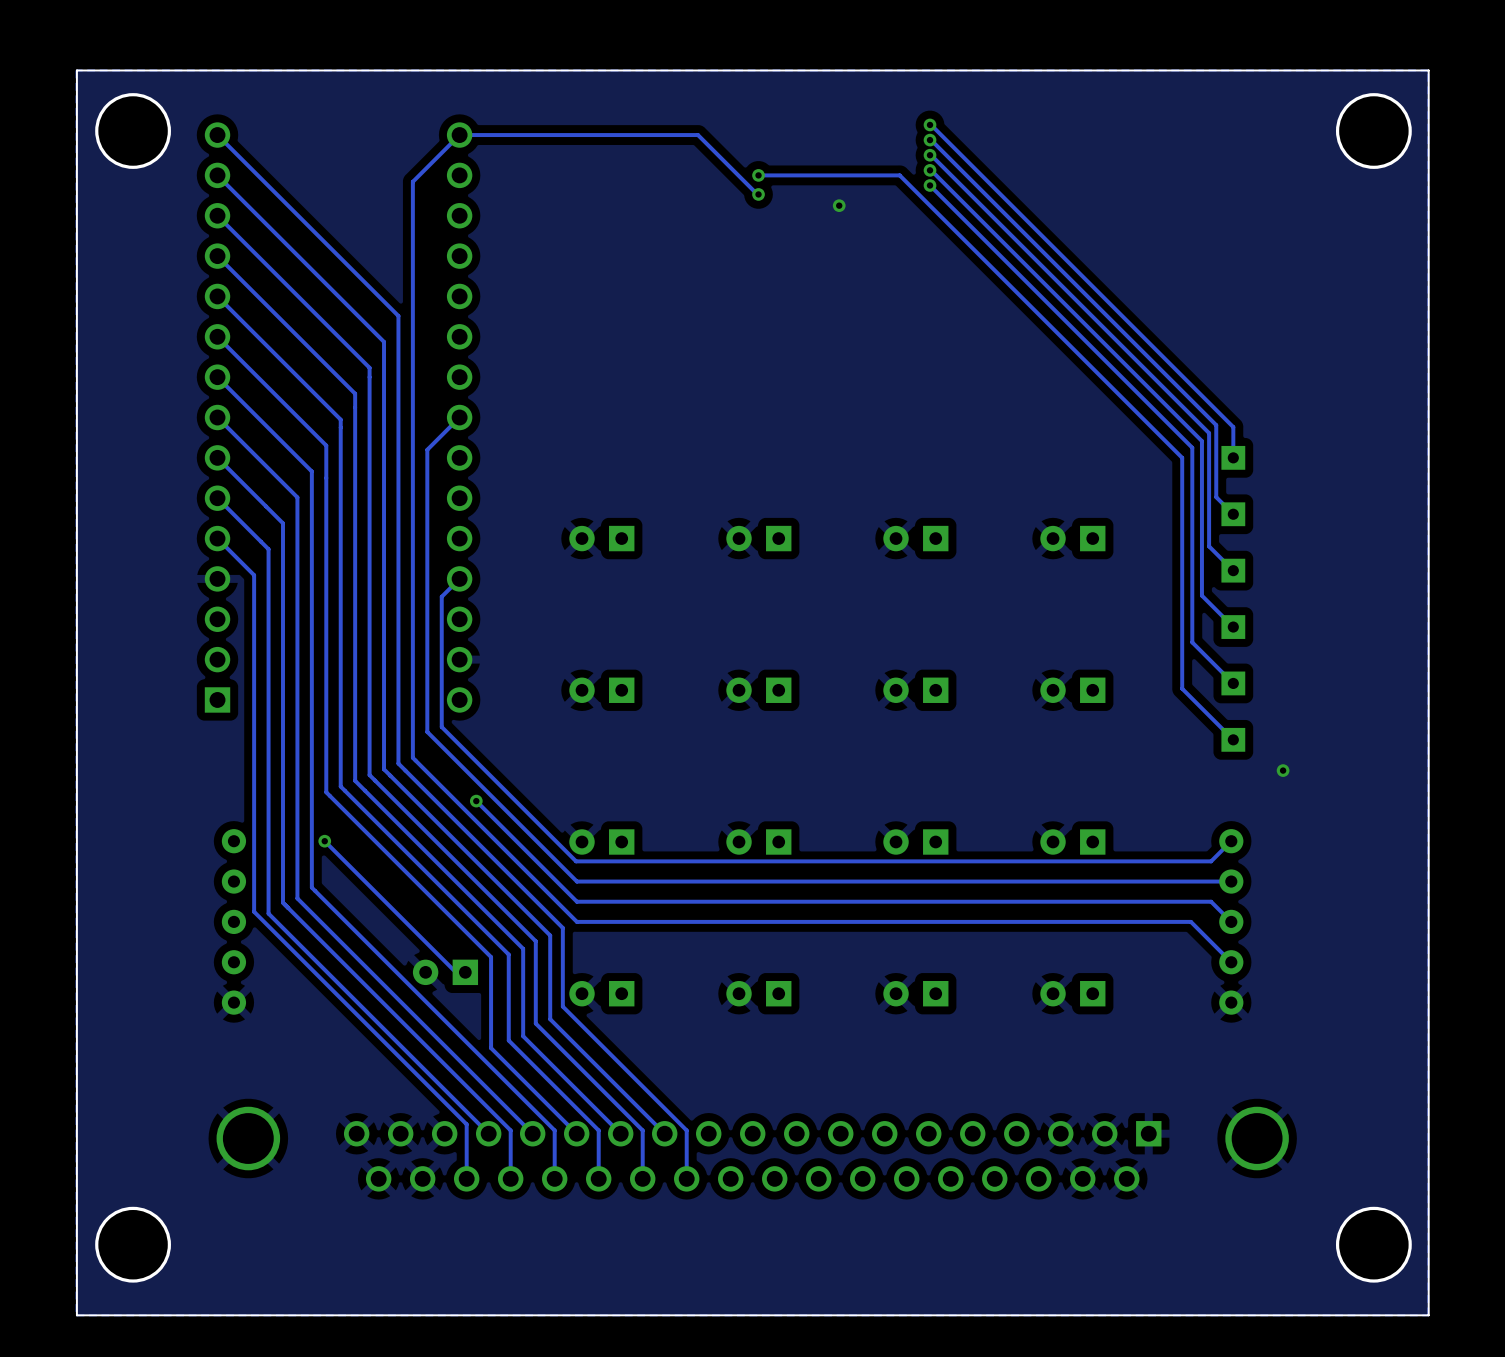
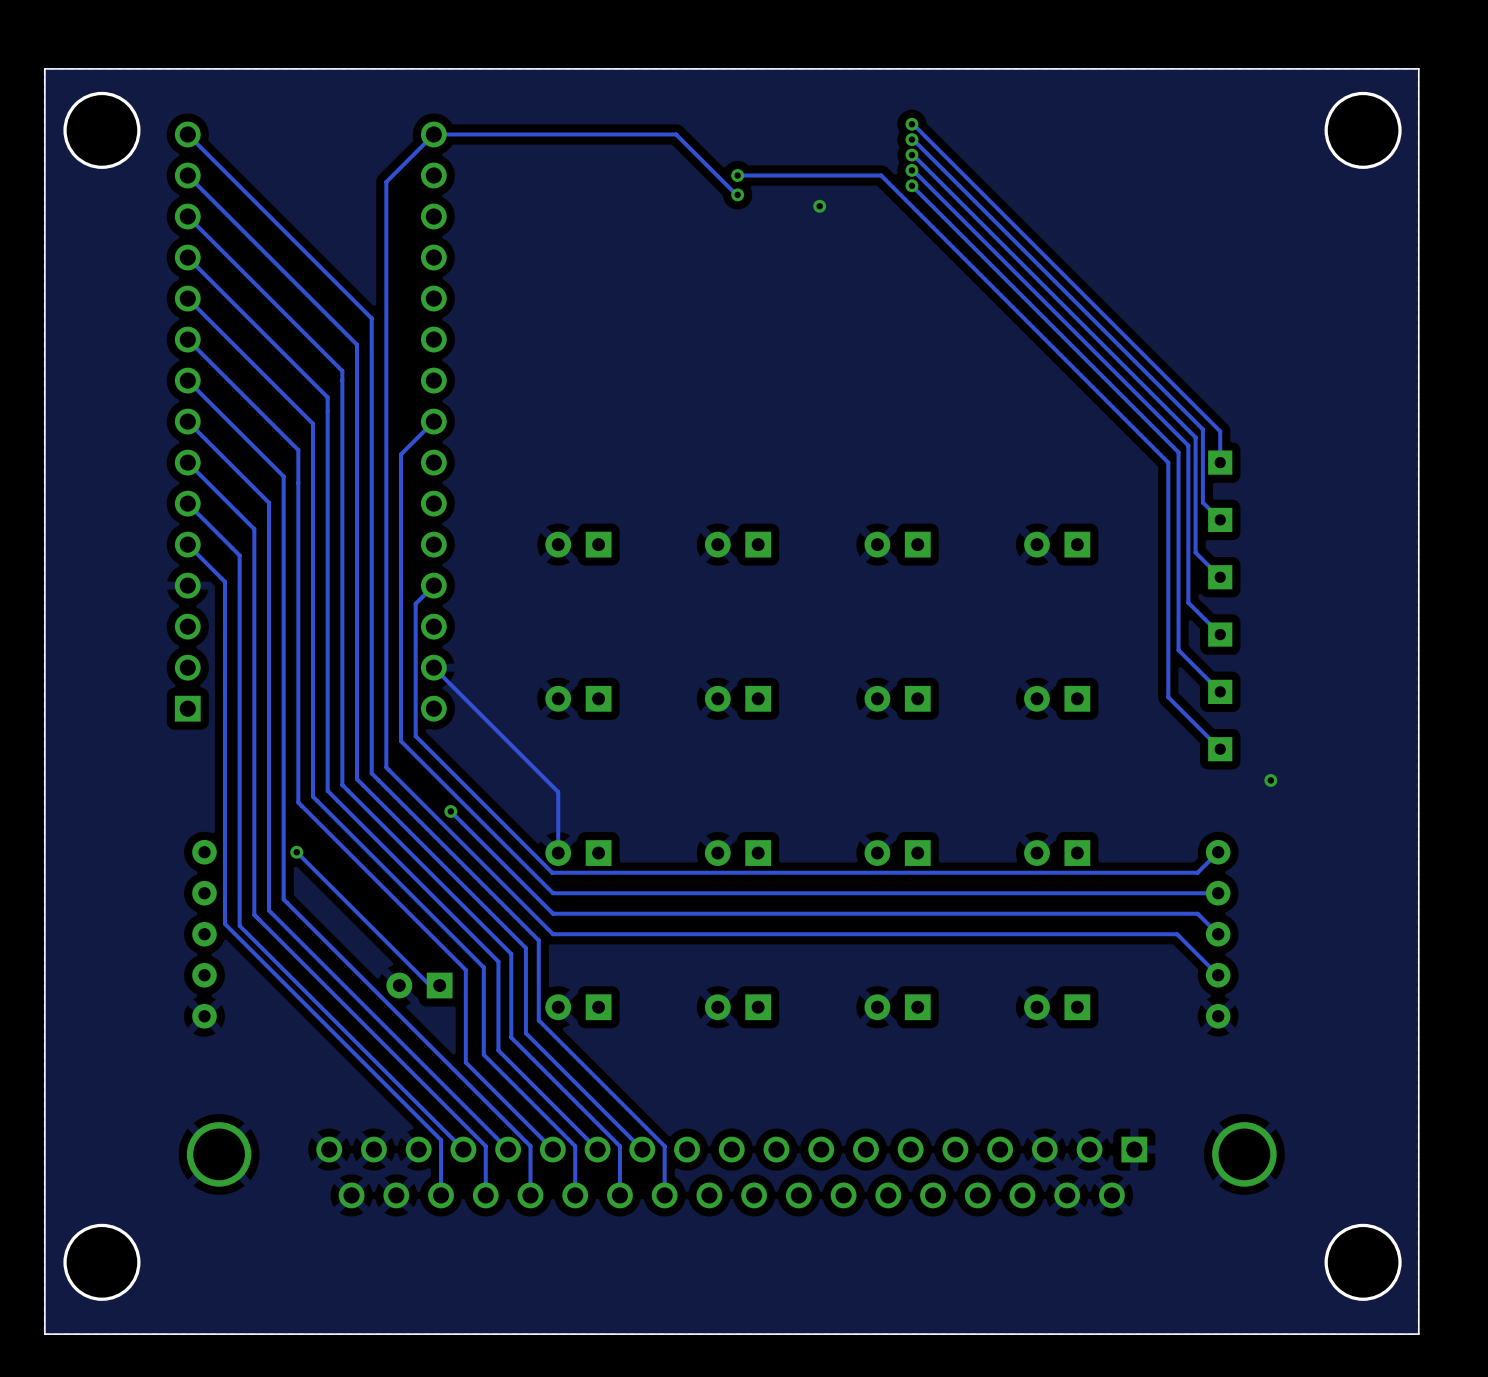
track: none -> (433, 667) (558, 792) (558, 853)

